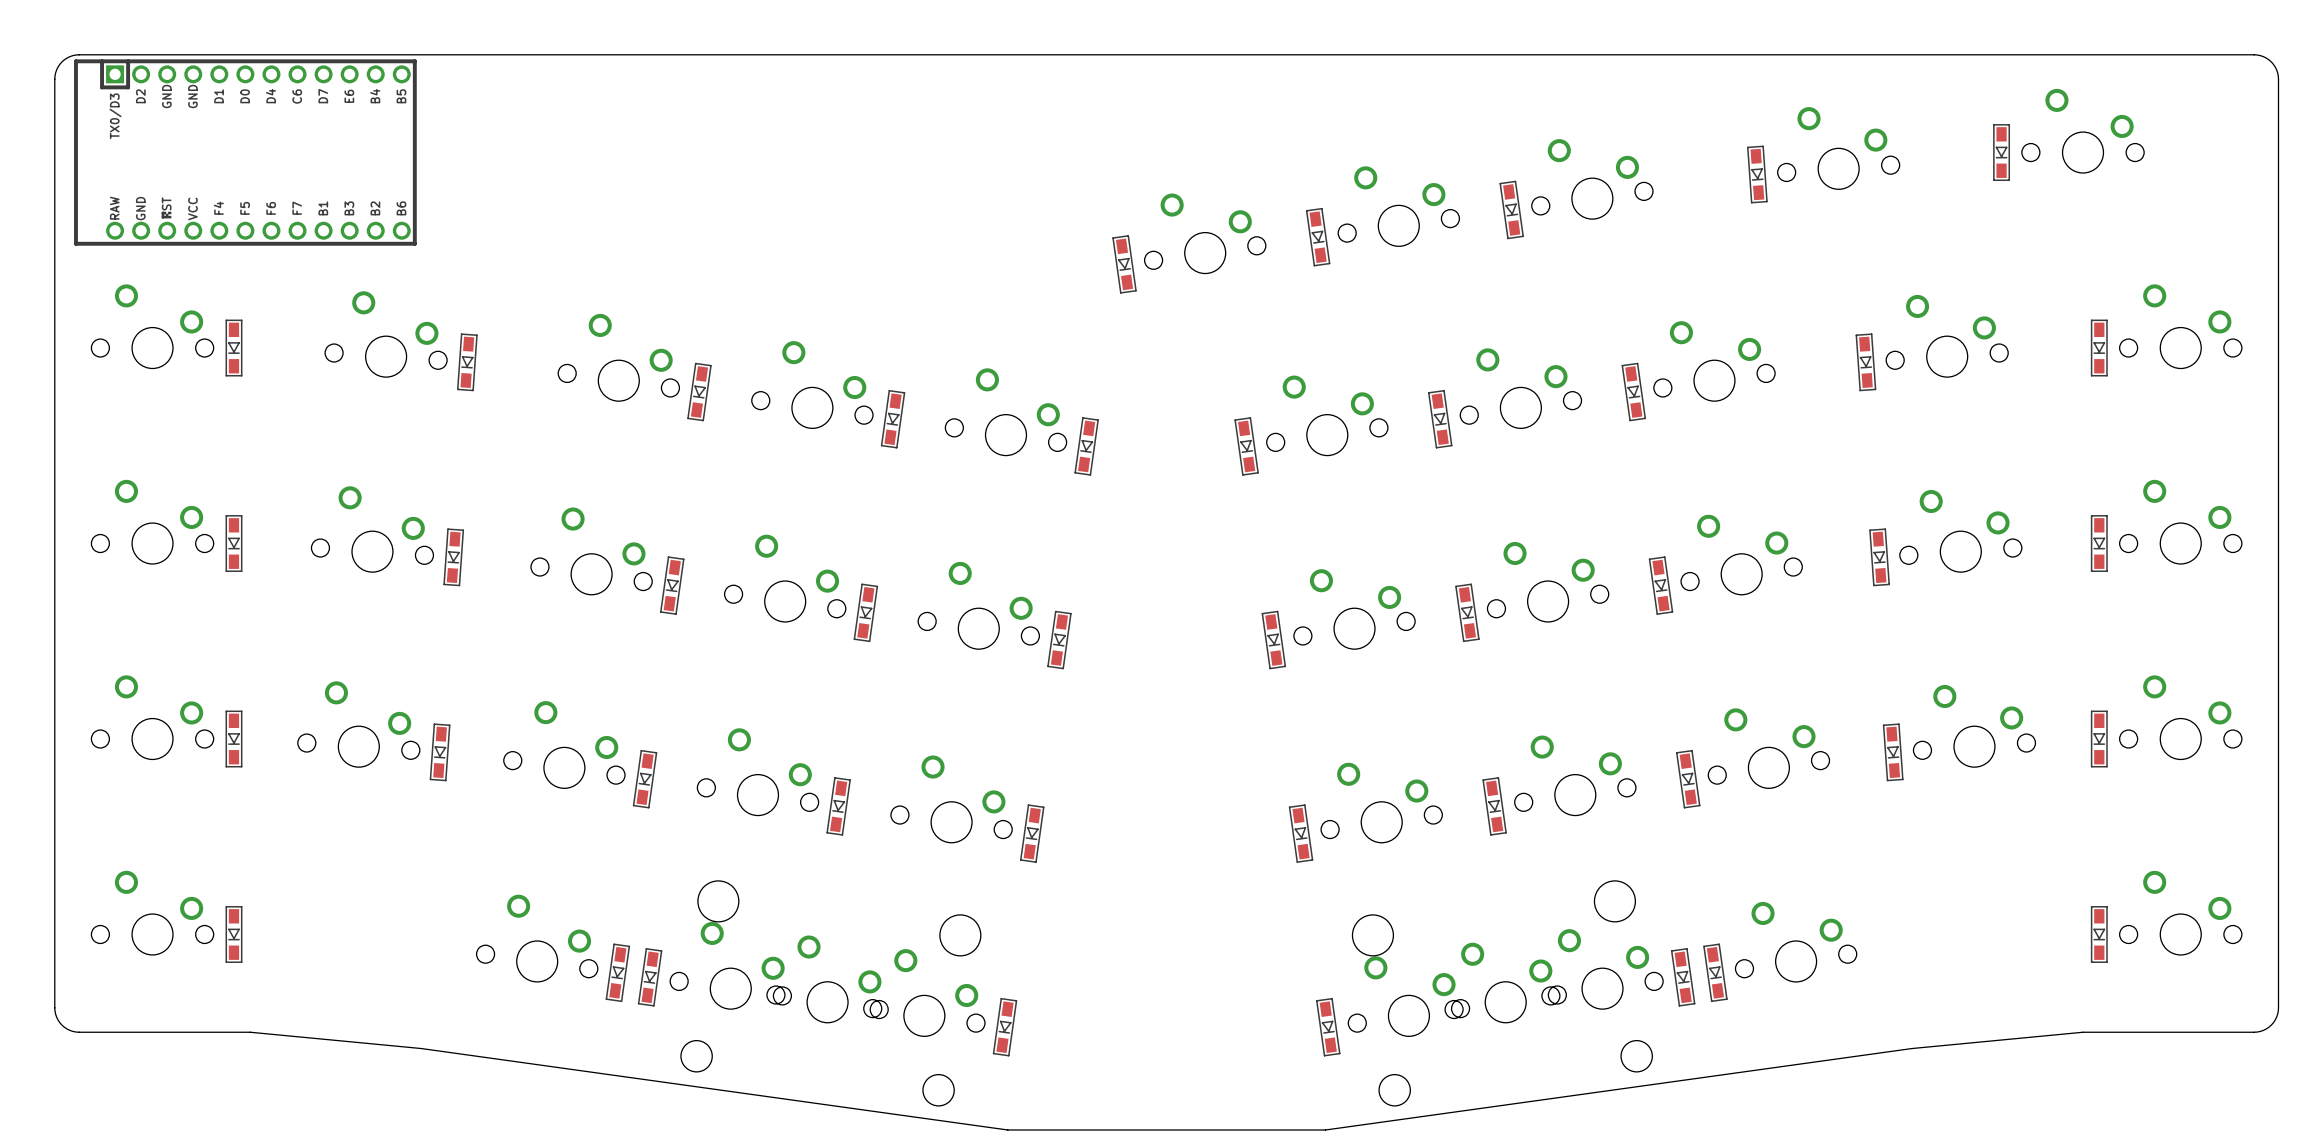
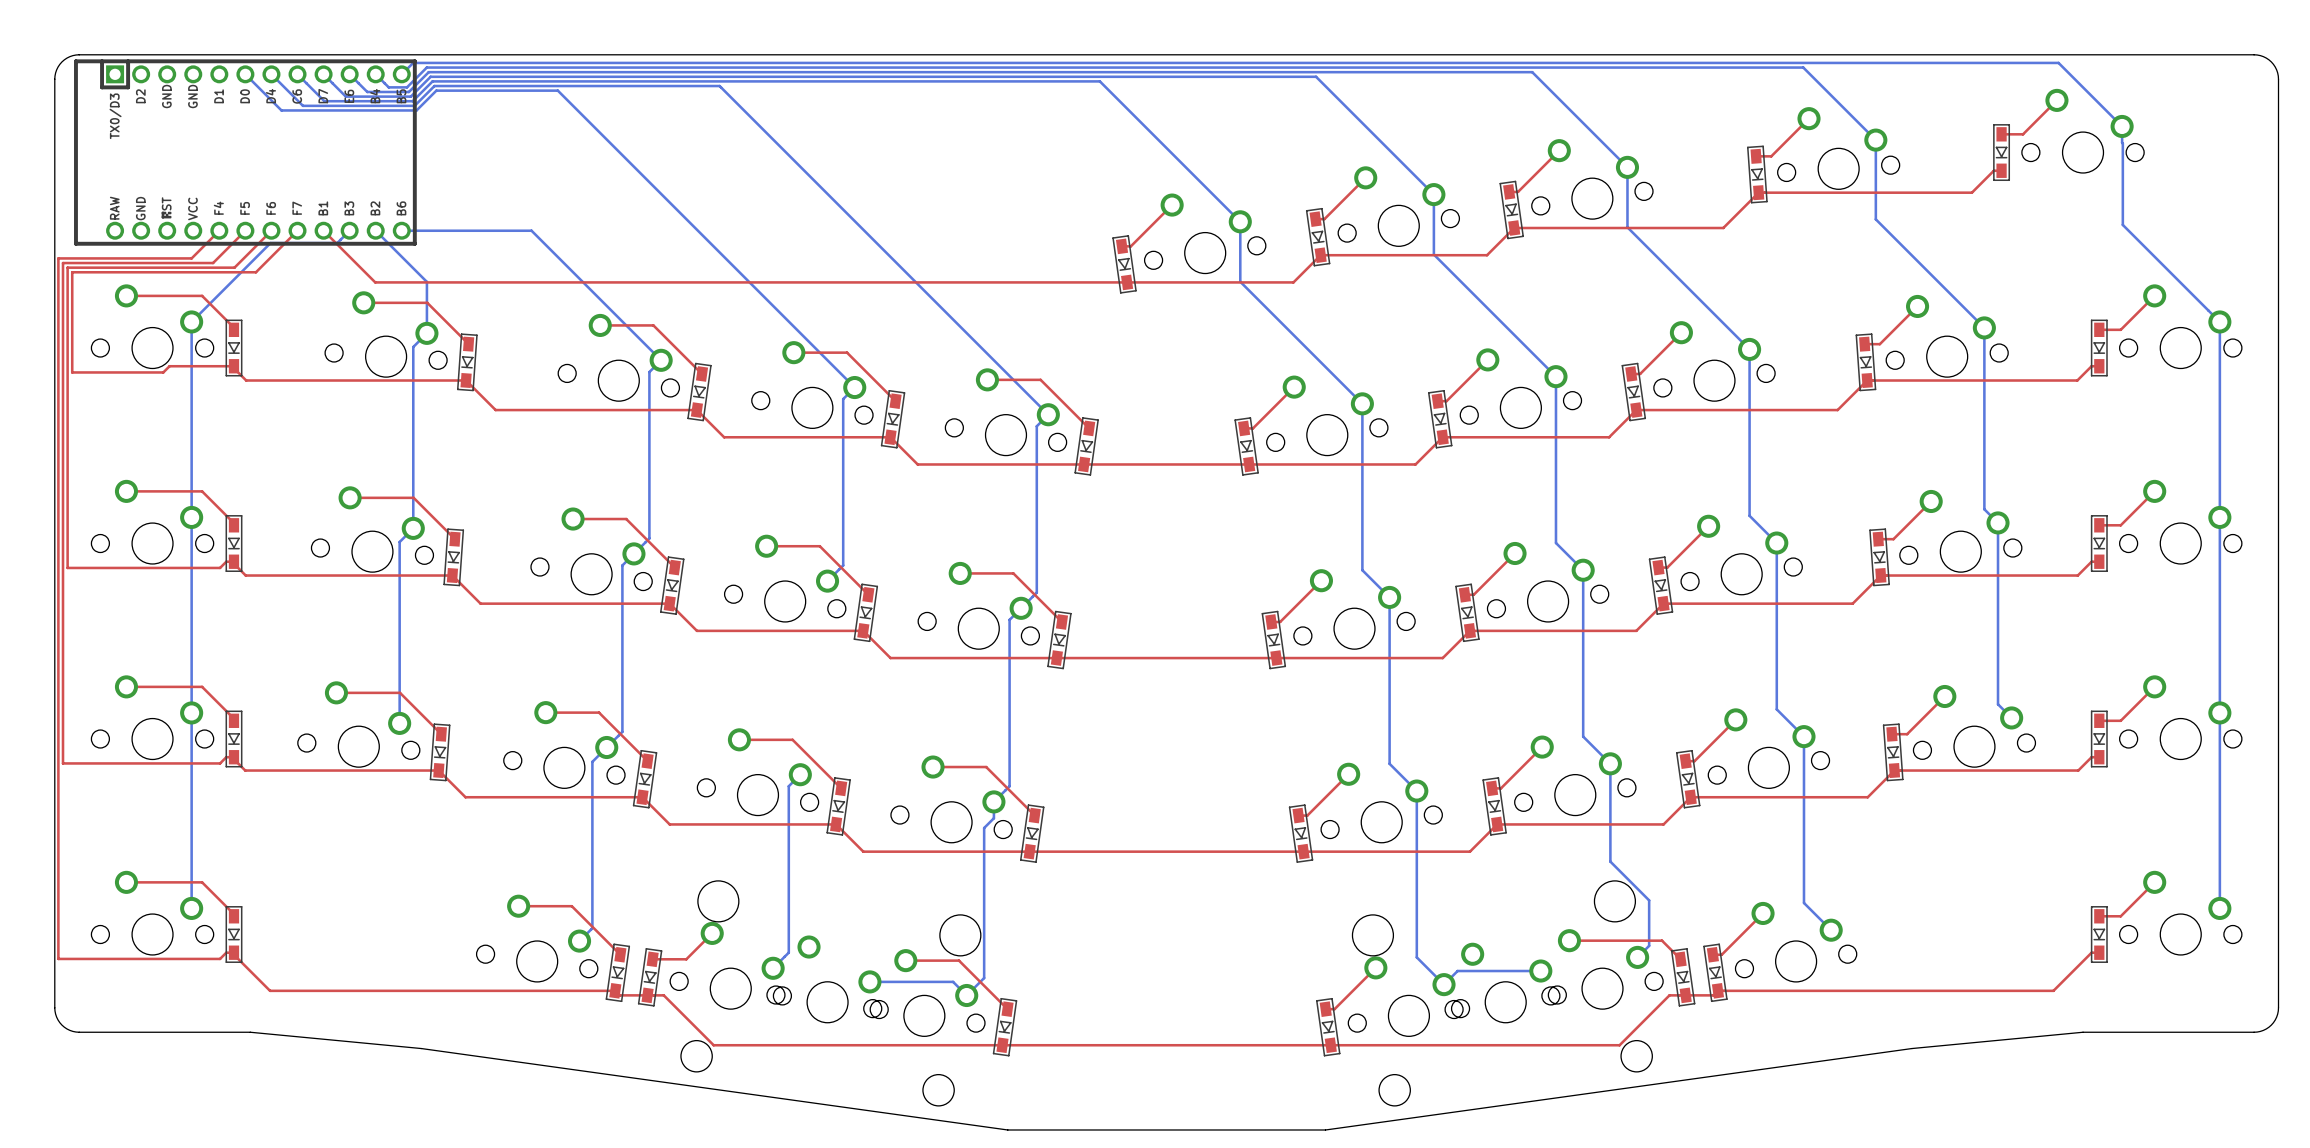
bottom track: none -> (245, 74) (281, 110) (416, 110) (436, 90) (557, 90) (854, 387) (843, 399) (843, 565) (827, 581)
bottom track: none -> (271, 74) (302, 105) (414, 105) (434, 86) (719, 86) (1048, 414) (1036, 426) (1036, 592) (1009, 619) (1009, 786) (993, 801) (993, 818) (984, 828) (984, 978) (966, 995) (953, 981) (869, 981)
bottom track: none -> (297, 74) (324, 101) (412, 101) (432, 81) (1099, 81) (1240, 221) (1240, 281) (1362, 403) (1362, 570) (1389, 597) (1389, 763) (1416, 791) (1416, 957) (1444, 984) (1457, 971) (1540, 971)
bottom track: none -> (323, 74) (345, 96) (410, 96) (430, 76) (1316, 76) (1433, 194) (1433, 254) (1555, 376) (1555, 543) (1583, 570) (1583, 736) (1610, 763) (1610, 861) (1649, 900) (1649, 945) (1637, 957)
bottom track: none -> (349, 74) (367, 91) (408, 91) (428, 72) (1532, 72) (1627, 167) (1627, 227) (1749, 349) (1749, 515) (1776, 543) (1776, 709) (1803, 736) (1803, 903) (1831, 930)
bottom track: none -> (375, 74) (388, 87) (407, 87) (426, 67) (1803, 67) (1875, 140) (1875, 219) (1984, 327) (1984, 509) (1998, 522) (1998, 704) (2011, 717)
bottom track: none -> (401, 74) (413, 62) (2058, 62) (2122, 126) (2122, 224) (2219, 321) (2219, 908)
top track: none -> (2056, 100) (2023, 134) (2001, 134)
top track: none -> (1809, 118) (1771, 156) (1756, 156)
top track: none -> (1559, 150) (1518, 191) (1509, 191)
top track: none -> (2001, 170) (1993, 170) (1971, 192) (1758, 192) (1723, 228) (1514, 228) (1487, 255) (1320, 255) (1293, 282) (375, 282) (323, 230)
top track: none -> (1365, 177) (1324, 219) (1315, 219)
top track: none -> (1172, 205) (1130, 246) (1122, 246)
top track: none -> (219, 230) (191, 258) (58, 258) (58, 958) (220, 958) (226, 952) (233, 952) (270, 990) (615, 990) (619, 995) (663, 995) (713, 1045) (1619, 1045) (1669, 995) (1713, 995) (1717, 990) (2053, 990) (2091, 952) (2099, 952)
top track: none -> (245, 230) (213, 263) (63, 263) (63, 763) (220, 763) (226, 757) (233, 757) (245, 770) (438, 770) (465, 797) (642, 797) (669, 824) (836, 824) (863, 851) (1469, 851) (1497, 824) (1663, 824) (1690, 797) (1867, 797) (1894, 770) (2078, 770) (2091, 757) (2099, 757)
top track: none -> (271, 230) (234, 267) (67, 267) (67, 567) (220, 567) (226, 561) (233, 561) (245, 575) (452, 575) (480, 603) (669, 603) (696, 630) (863, 630) (890, 658) (1442, 658) (1469, 630) (1636, 630) (1663, 603) (1852, 603) (1880, 575) (2077, 575) (2091, 561) (2099, 561)
top track: none -> (297, 230) (255, 272) (72, 272) (72, 372) (163, 372) (169, 366) (233, 366) (246, 380) (466, 380) (495, 410) (696, 410) (724, 437) (890, 437) (917, 464) (1415, 464) (1442, 437) (1609, 437) (1636, 410) (1837, 410) (1867, 380) (2077, 380) (2091, 366) (2099, 366)
bottom track: none -> (349, 230) (337, 243) (270, 243) (191, 321) (191, 908)
bottom track: none -> (375, 230) (426, 281) (426, 333) (413, 347) (413, 528) (399, 542) (399, 723)
bottom track: none -> (401, 230) (531, 230) (661, 360) (649, 372) (649, 538) (622, 565) (622, 731) (592, 761) (592, 928) (579, 941)
top track: none -> (126, 295) (202, 295) (233, 329)
top track: none -> (2154, 295) (2120, 329) (2099, 329)
top track: none -> (363, 302) (427, 302) (468, 344)
top track: none -> (1917, 306) (1879, 344) (1864, 344)
top track: none -> (600, 325) (653, 325) (702, 373)
top track: none -> (1681, 332) (1640, 373) (1631, 373)
top track: none -> (793, 352) (847, 352) (895, 401)
top track: none -> (1487, 359) (1446, 401) (1437, 401)
top track: none -> (987, 379) (1040, 379) (1089, 428)
top track: none -> (1294, 387) (1252, 428) (1244, 428)
top track: none -> (126, 491) (202, 491) (233, 525)
top track: none -> (2154, 491) (2120, 525) (2099, 525)
top track: none -> (350, 497) (413, 497) (454, 539)
top track: none -> (1931, 501) (1893, 539) (1878, 539)
top track: none -> (573, 519) (626, 519) (674, 567)
top track: none -> (1708, 526) (1667, 567) (1658, 567)
top track: none -> (766, 546) (819, 546) (868, 594)
top track: none -> (1515, 553) (1473, 594) (1464, 594)
top track: none -> (960, 573) (1013, 573) (1061, 621)
top track: none -> (1321, 580) (1280, 621) (1271, 621)
top track: none -> (126, 686) (202, 686) (233, 720)
top track: none -> (2154, 686) (2120, 720) (2099, 720)
top track: none -> (336, 692) (400, 692) (441, 734)
top track: none -> (1944, 696) (1907, 734) (1891, 734)
top track: none -> (545, 712) (599, 712) (647, 761)
top track: none -> (1735, 719) (1694, 761) (1685, 761)
top track: none -> (739, 739) (792, 739) (841, 788)
top track: none -> (1542, 747) (1500, 788) (1492, 788)
top track: none -> (933, 767) (986, 767) (1034, 815)
bottom track: none -> (800, 774) (788, 786) (788, 952) (773, 968)
top track: none -> (1348, 774) (1307, 815) (1298, 815)
top track: none -> (126, 882) (202, 882) (233, 916)
top track: none -> (2154, 882) (2120, 916) (2099, 916)
top track: none -> (518, 906) (571, 906) (620, 954)
top track: none -> (1763, 913) (1721, 954) (1712, 954)
top track: none -> (712, 933) (686, 959) (652, 959)
top track: none -> (1569, 940) (1662, 940) (1680, 959)
top track: none -> (905, 960) (959, 960) (1007, 1009)
top track: none -> (1375, 967) (1334, 1009) (1325, 1009)

